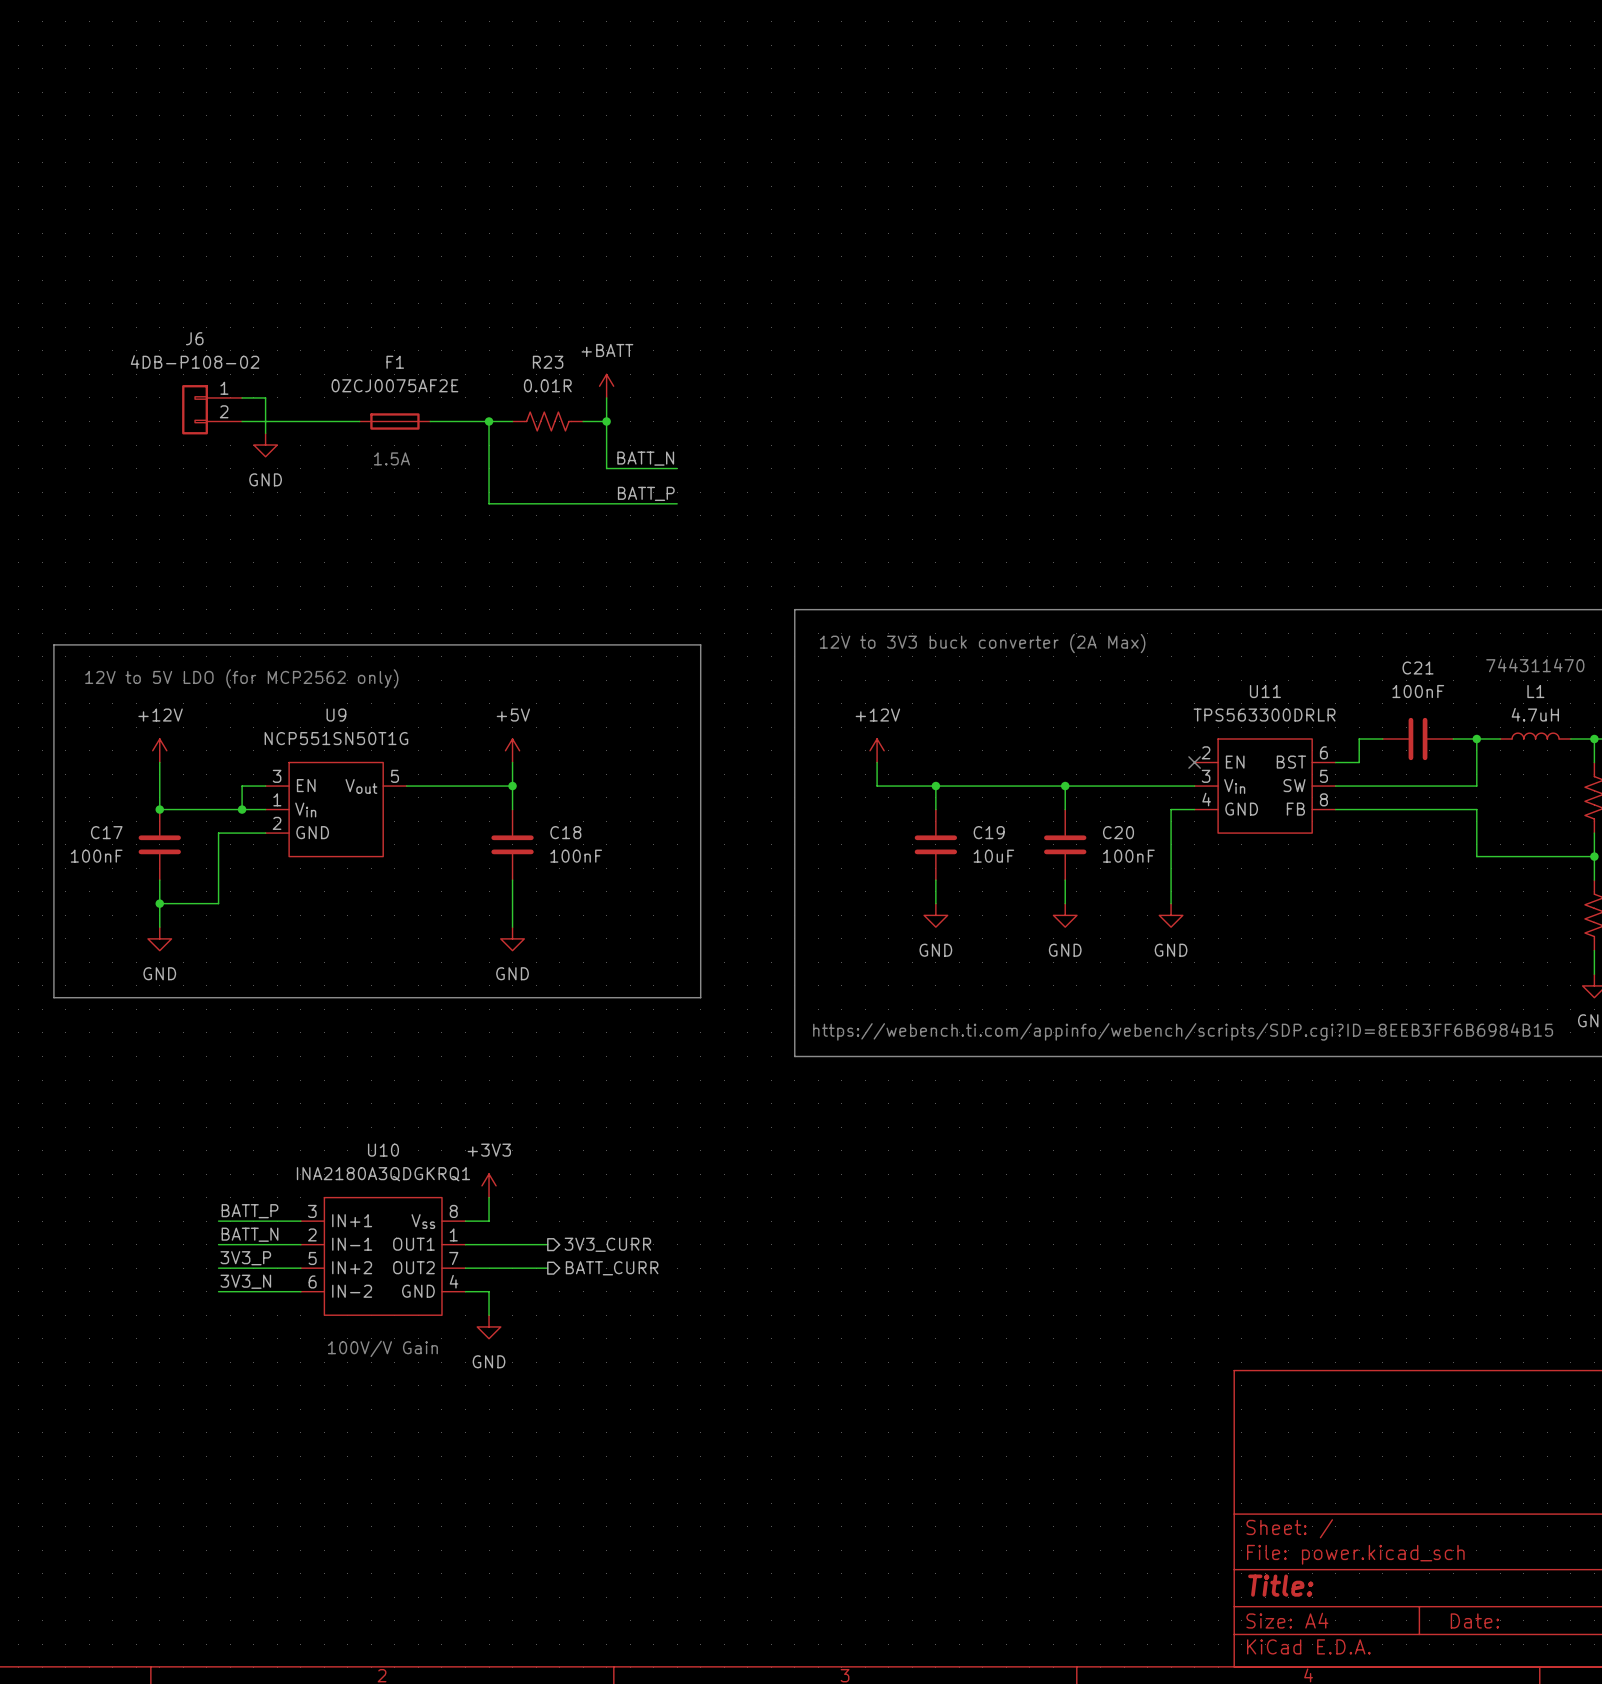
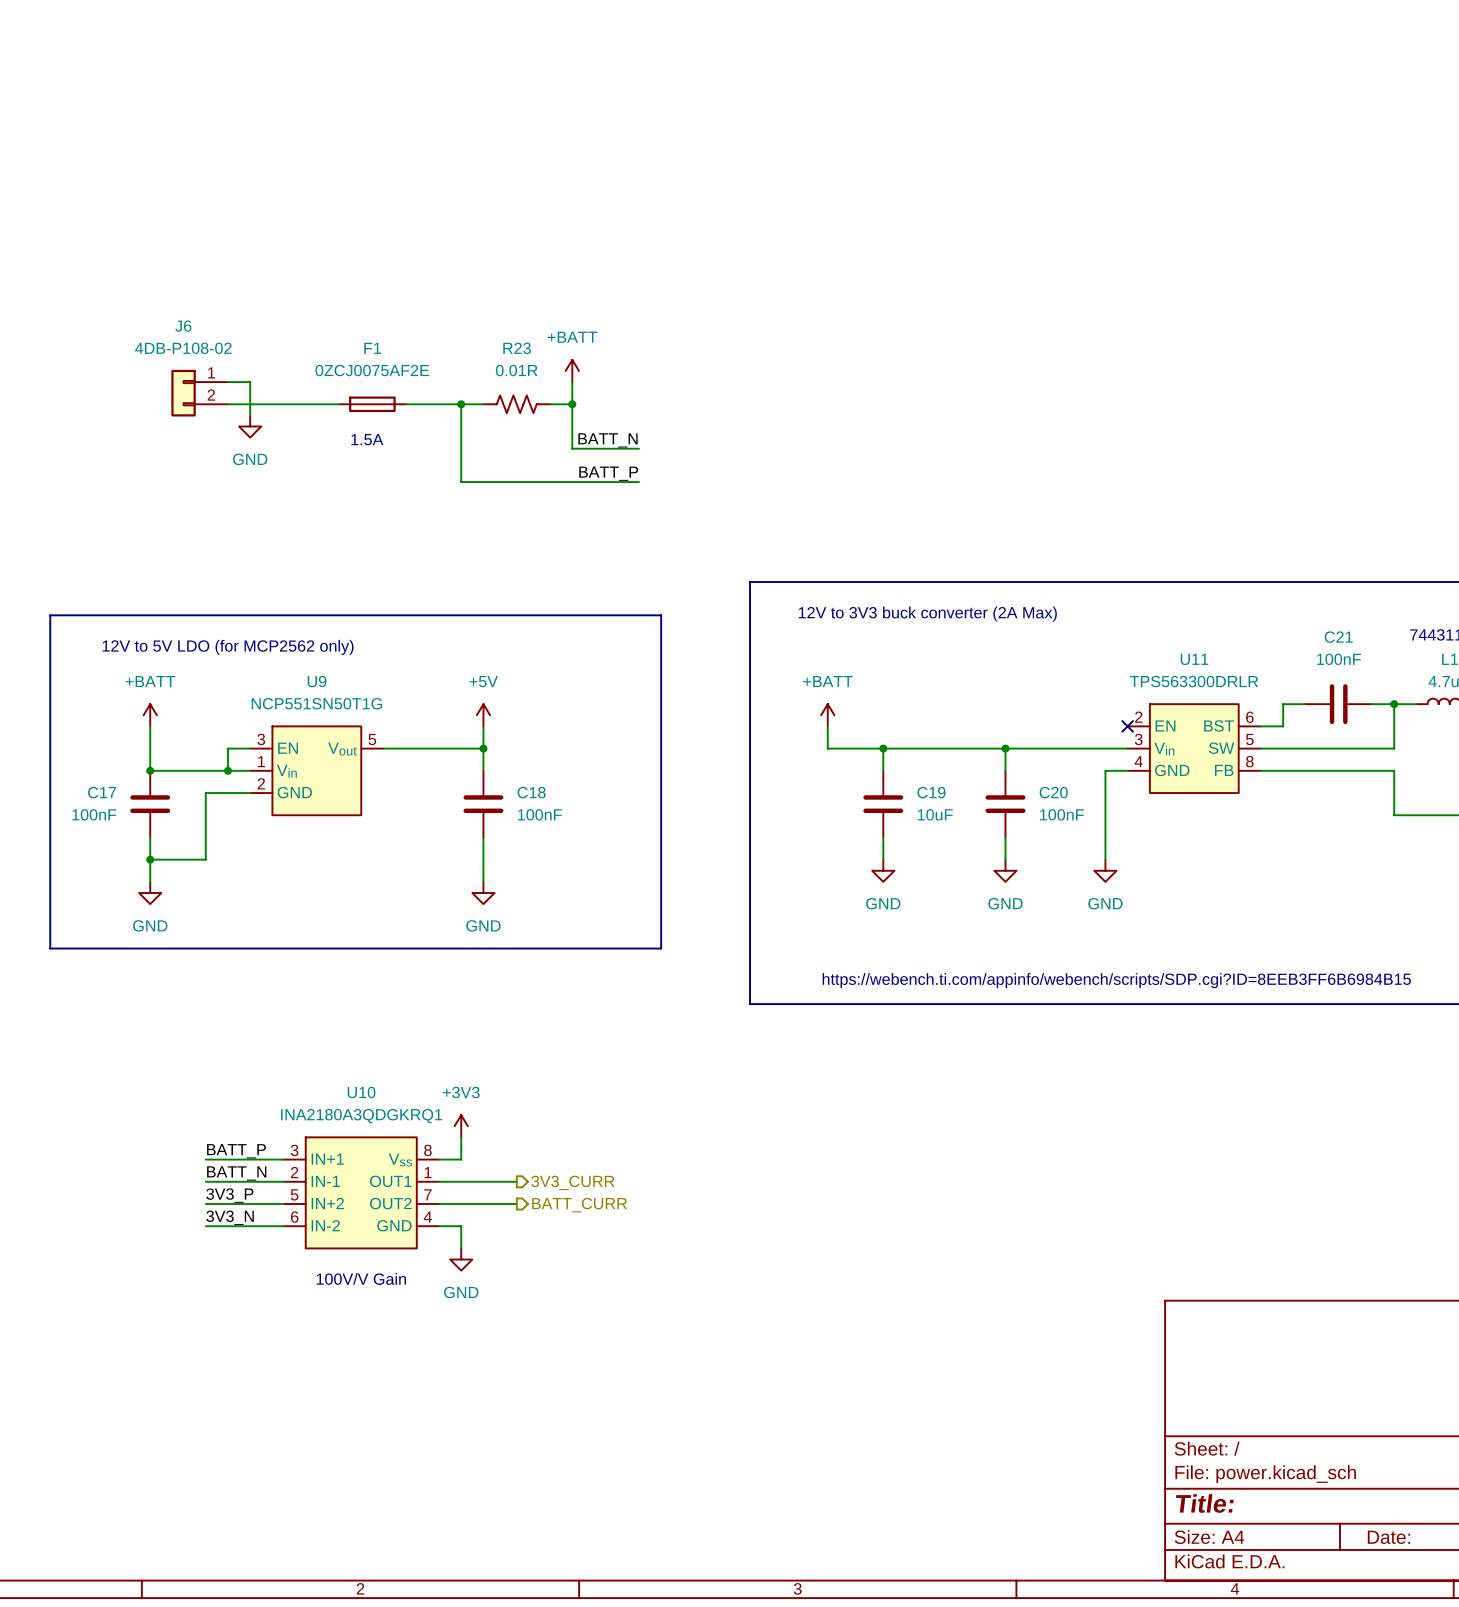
power symbol: +12V (159, 750) -> +BATT (150, 715)
power symbol: +12V (877, 750) -> +BATT (827, 715)

